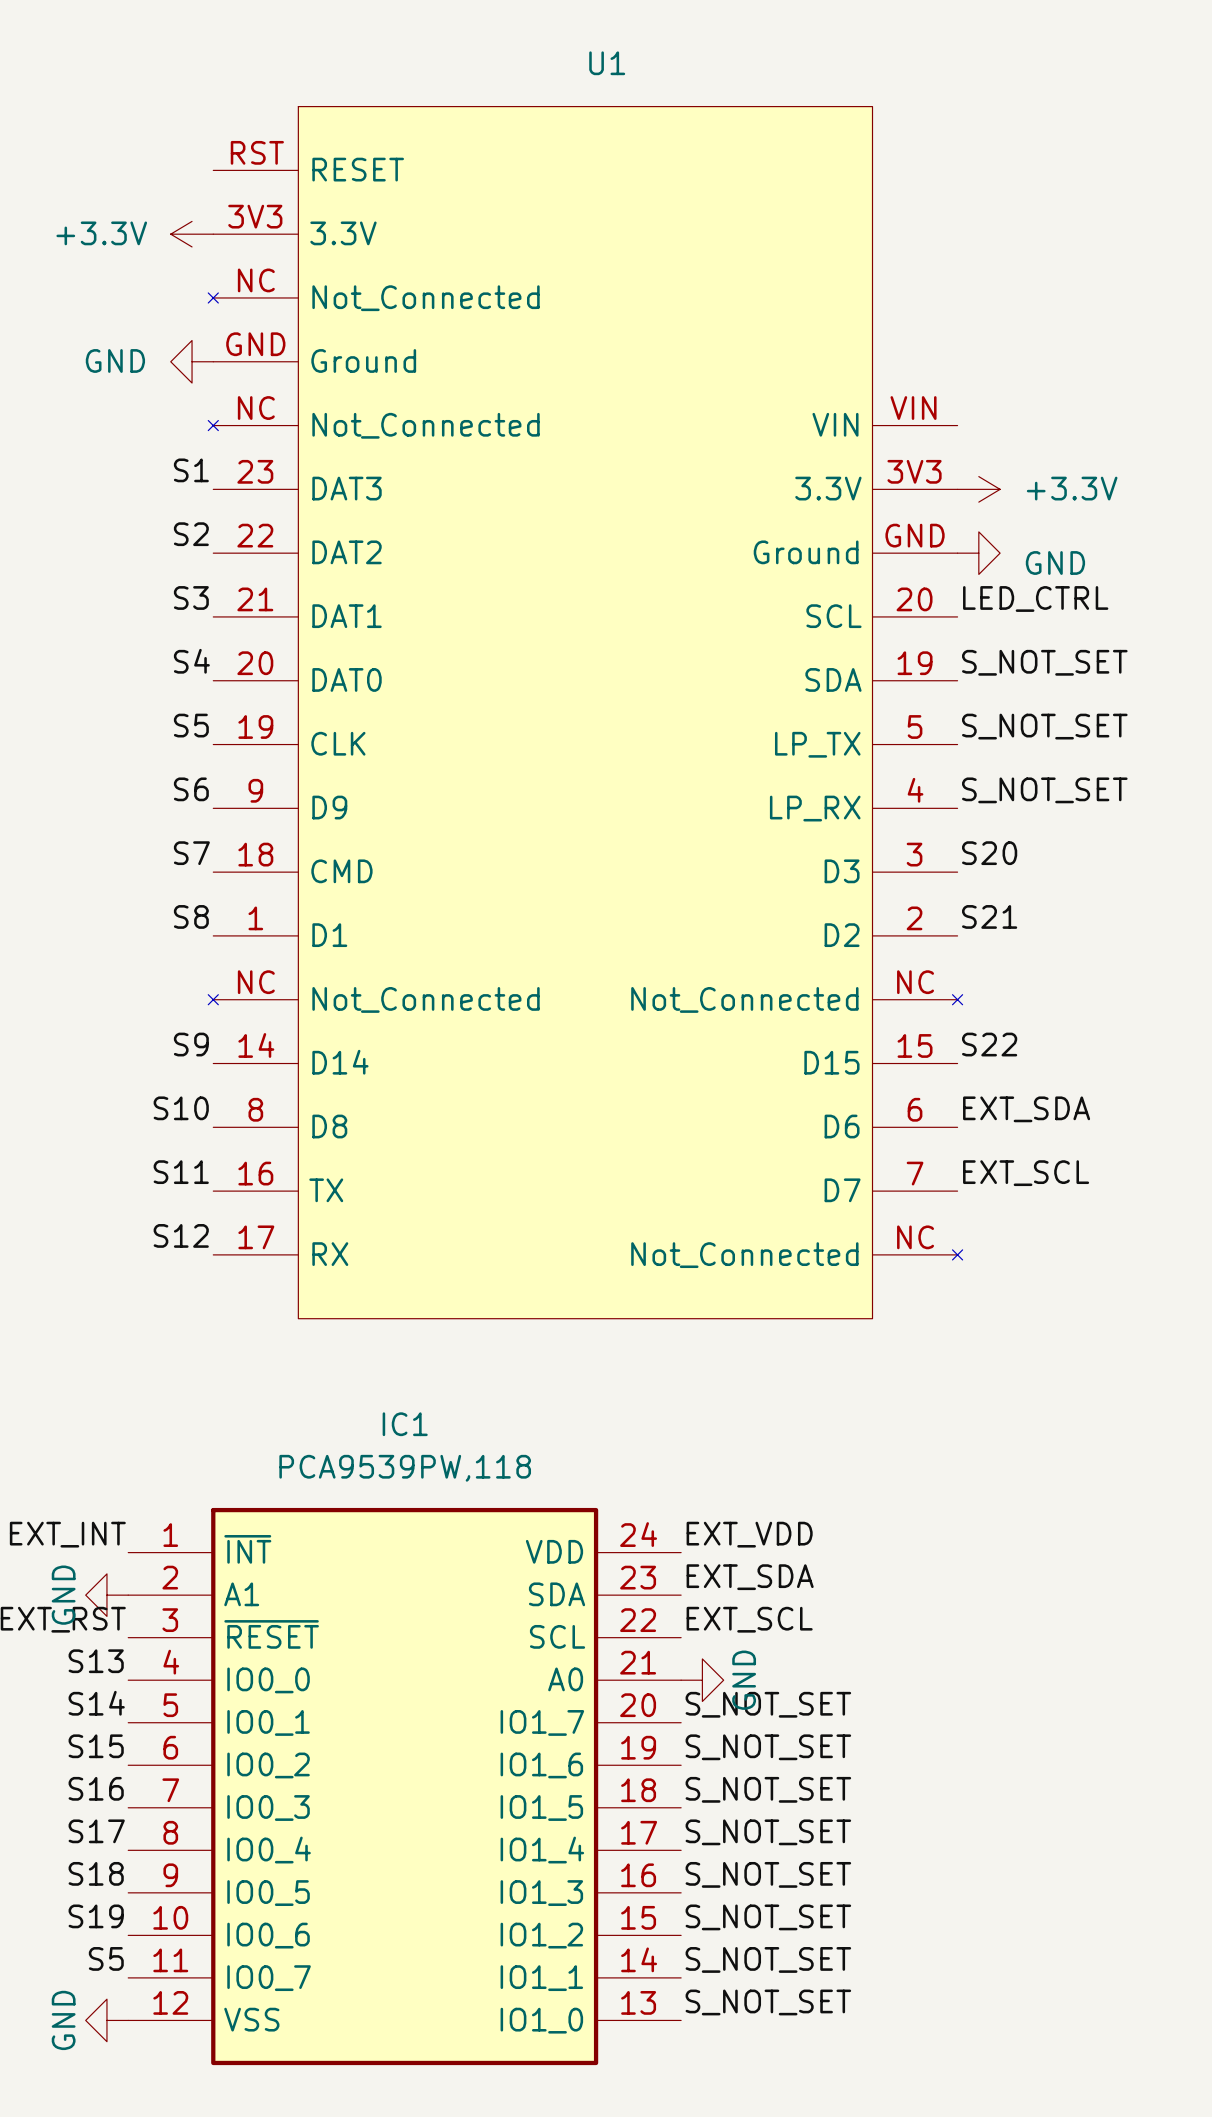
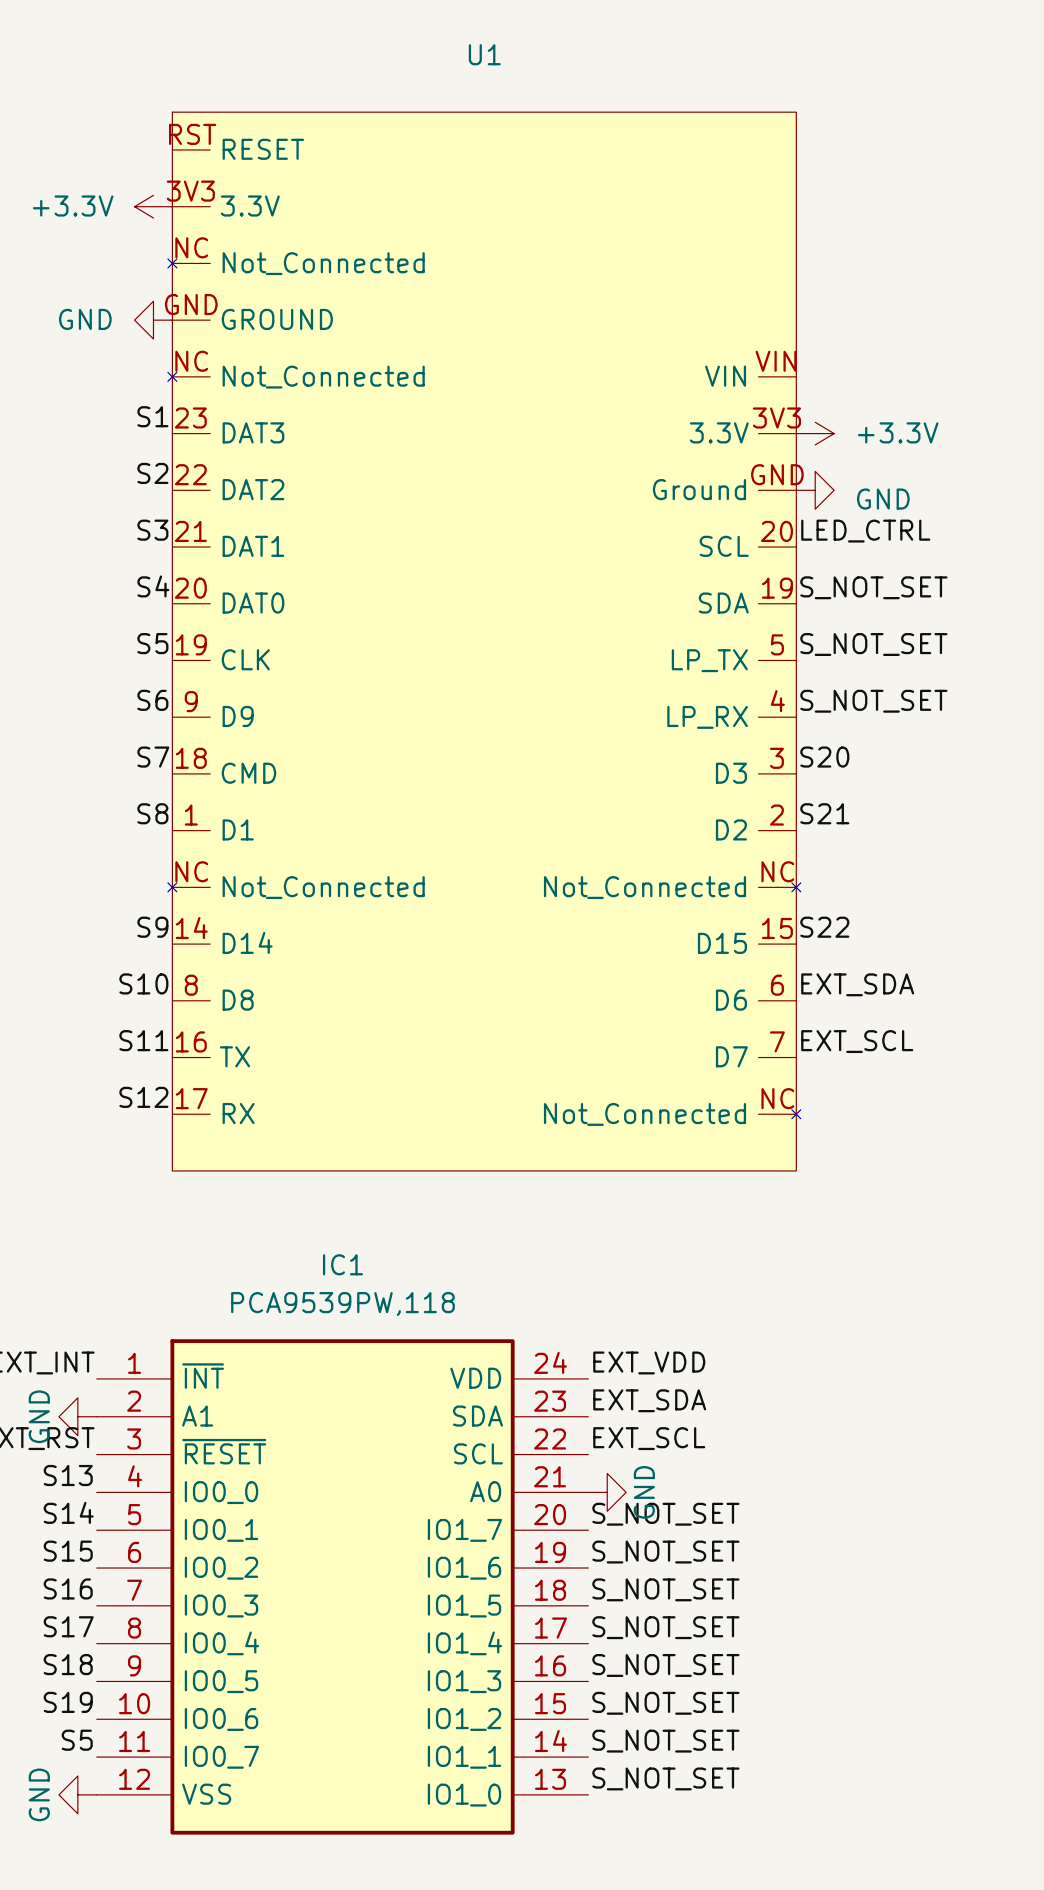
U1 symbol: [208, 106, 963, 1319] -> [167, 112, 801, 1171]
power symbol position: +3.3V (978, 489) -> +3.3V (815, 433)
power symbol position: GND (978, 553) -> GND (815, 490)
label position: LED_CTRL (1035, 598) -> LED_CTRL (865, 531)
label position: S_NOT_SET (1044, 662) -> S_NOT_SET (873, 587)
label position: S_NOT_SET (1044, 726) -> S_NOT_SET (873, 644)
label position: S_NOT_SET (1044, 790) -> S_NOT_SET (873, 701)
label position: S20 (989, 853) -> S20 (824, 757)
label position: S21 (989, 916) -> S21 (824, 813)
label position: S22 (989, 1044) -> S22 (824, 927)
label position: EXT_SDA (1026, 1109) -> EXT_SDA (857, 984)
label position: EXT_SCL (1026, 1173) -> EXT_SCL (857, 1041)

